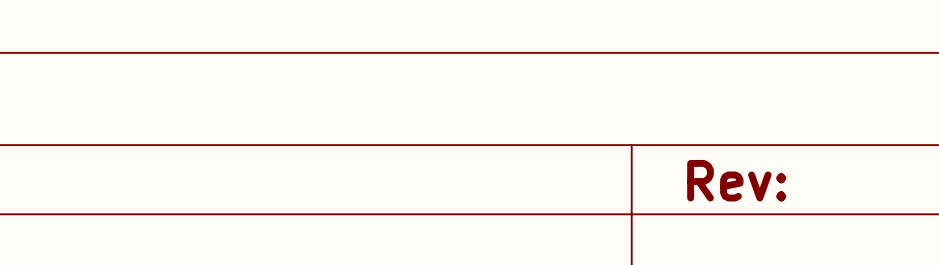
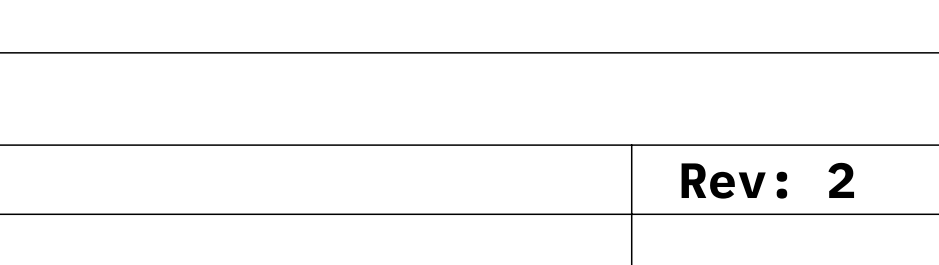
title block: Rev: (736, 180) -> Rev: 2 (767, 180)

